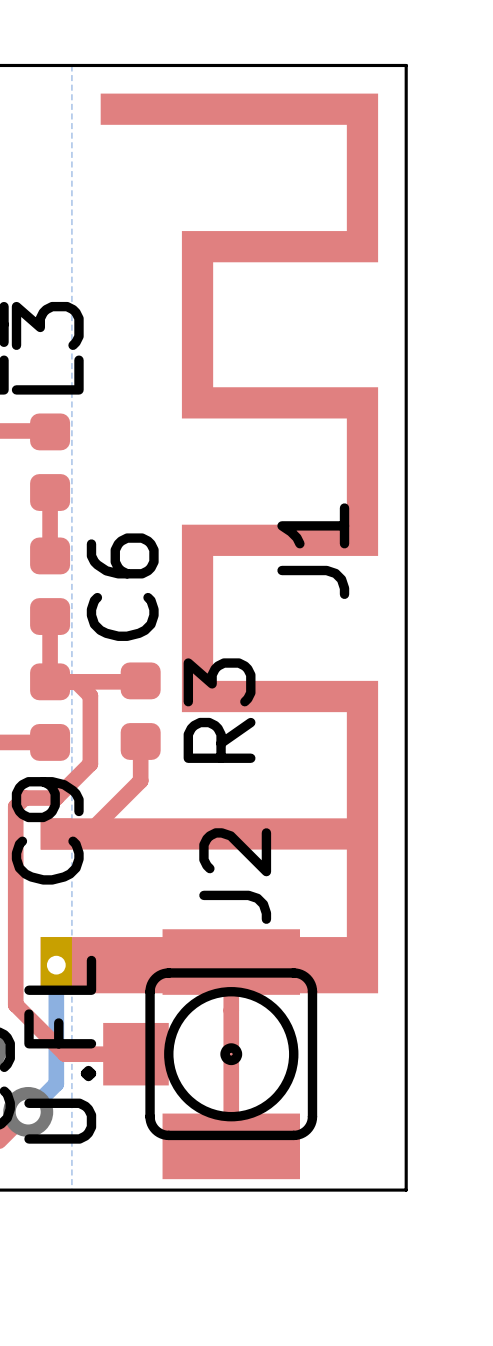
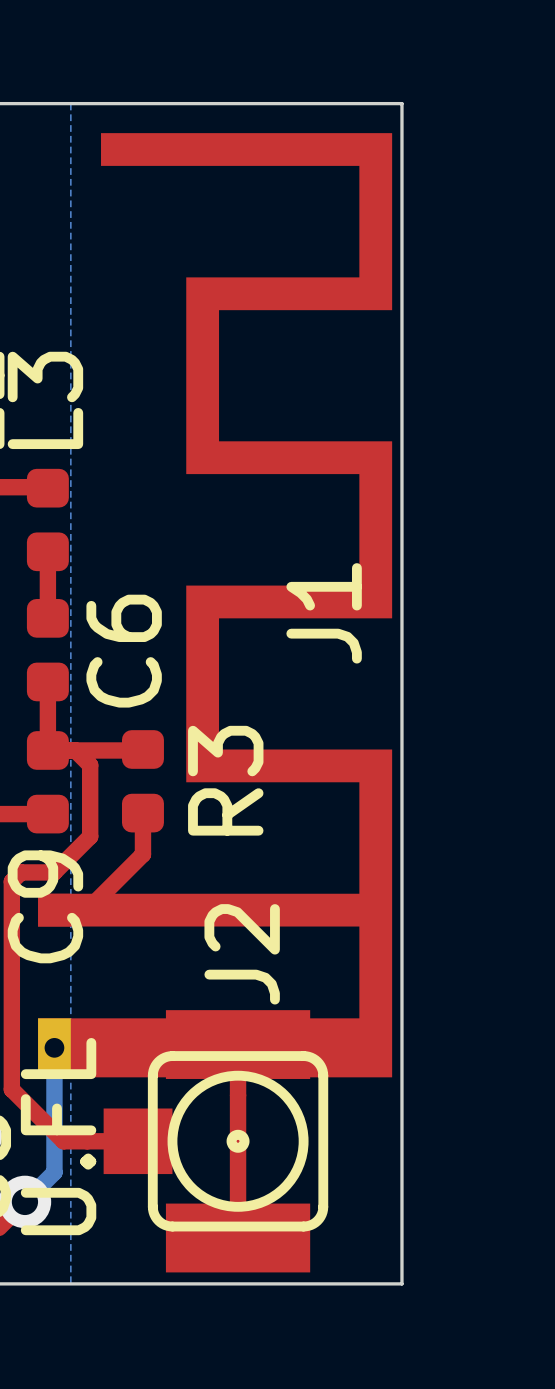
board edge: (387, 65) (406, 65) (406, 1190) (387, 1190) -> (401, 103) (401, 1283)

